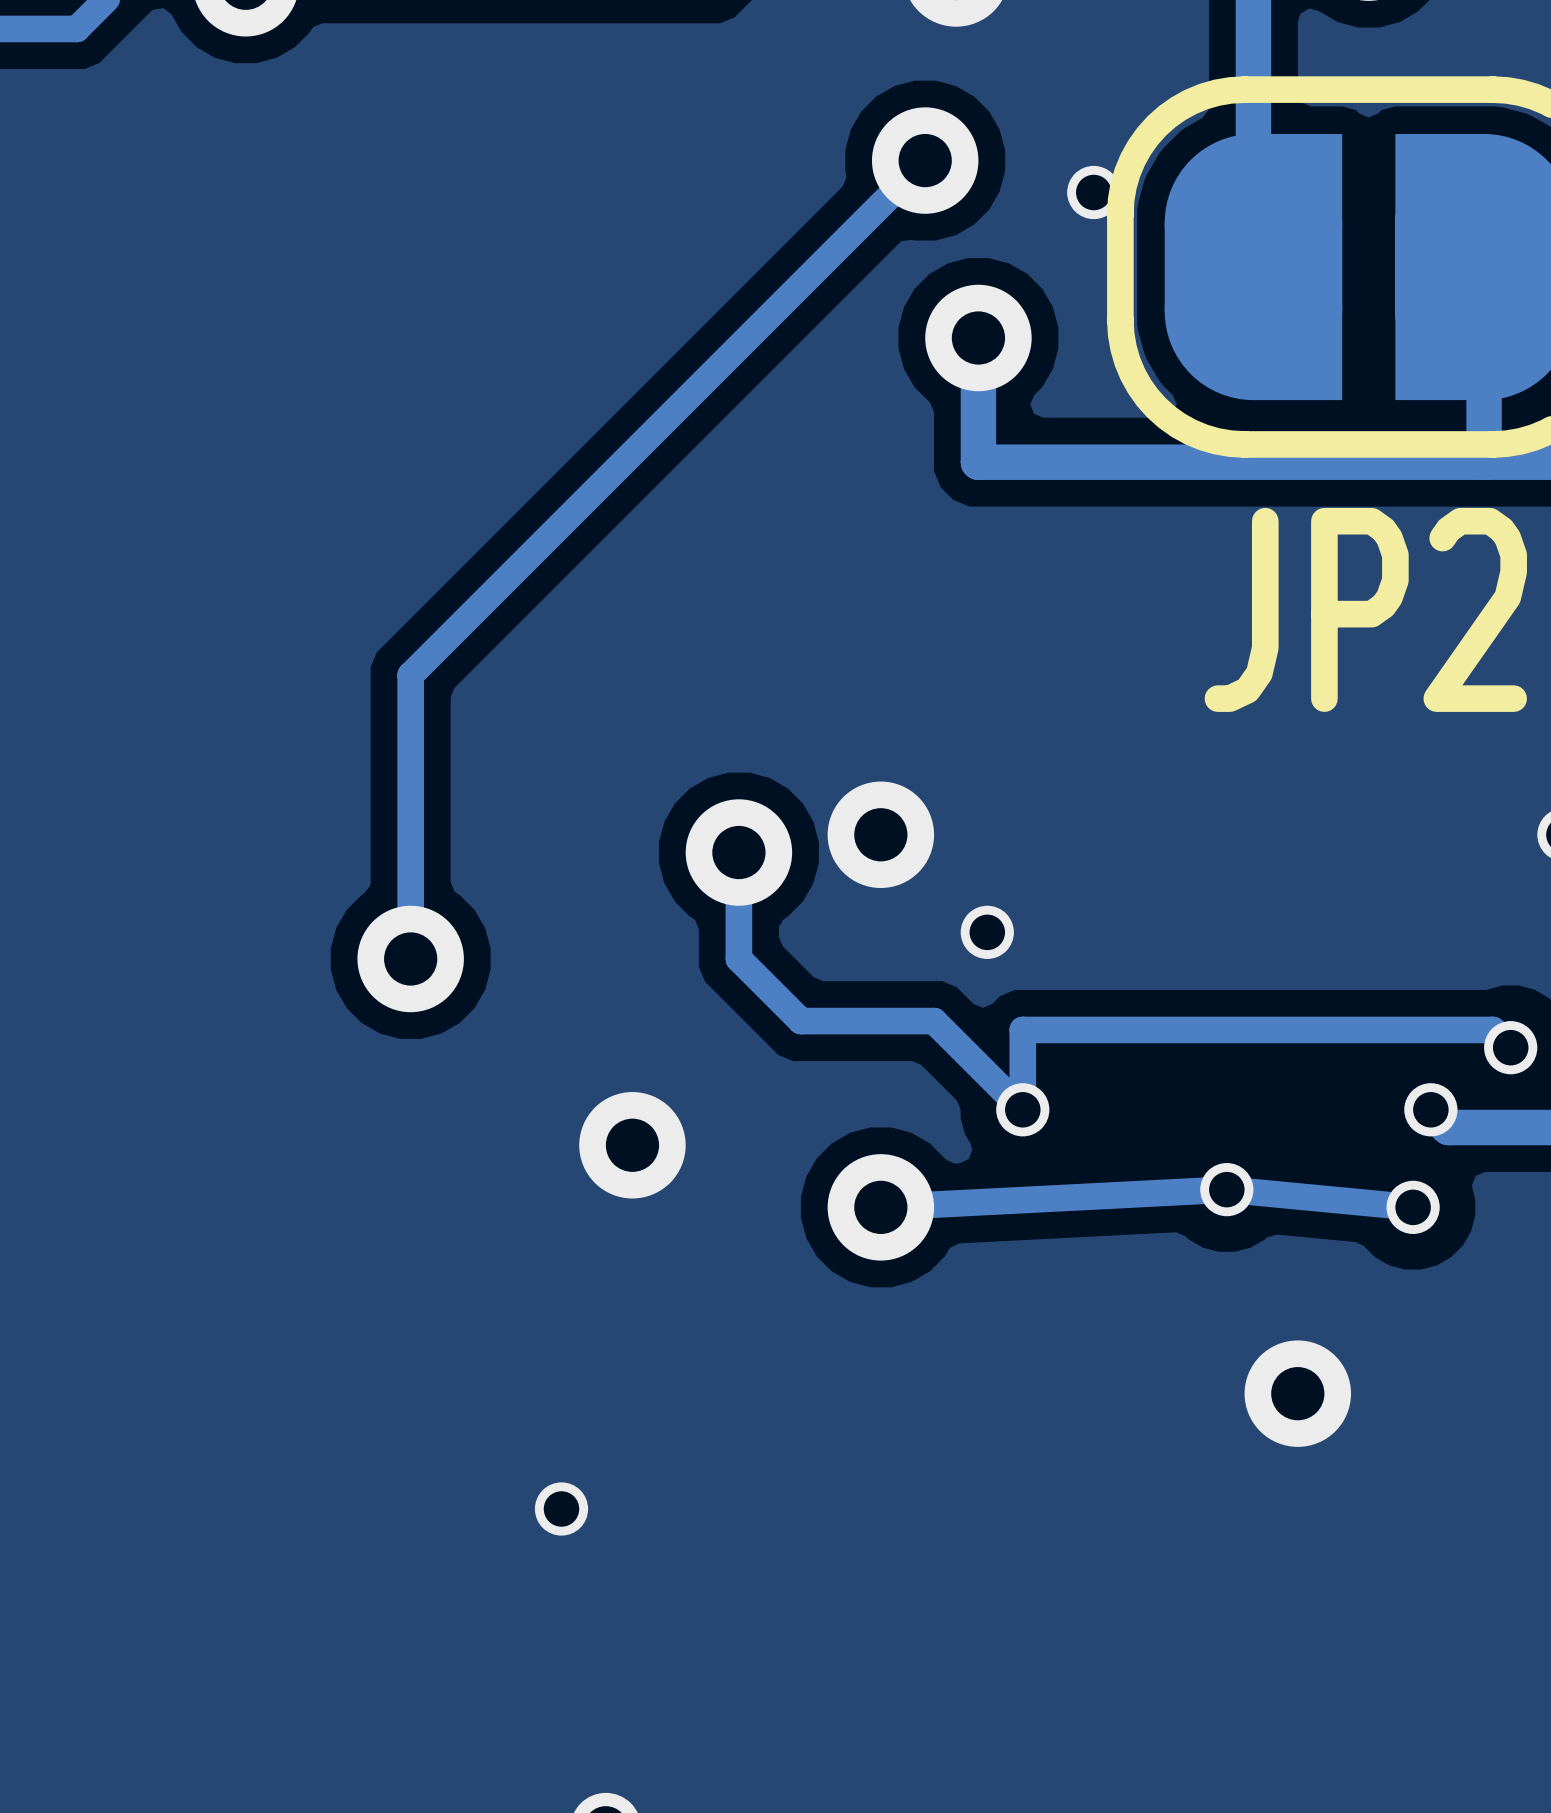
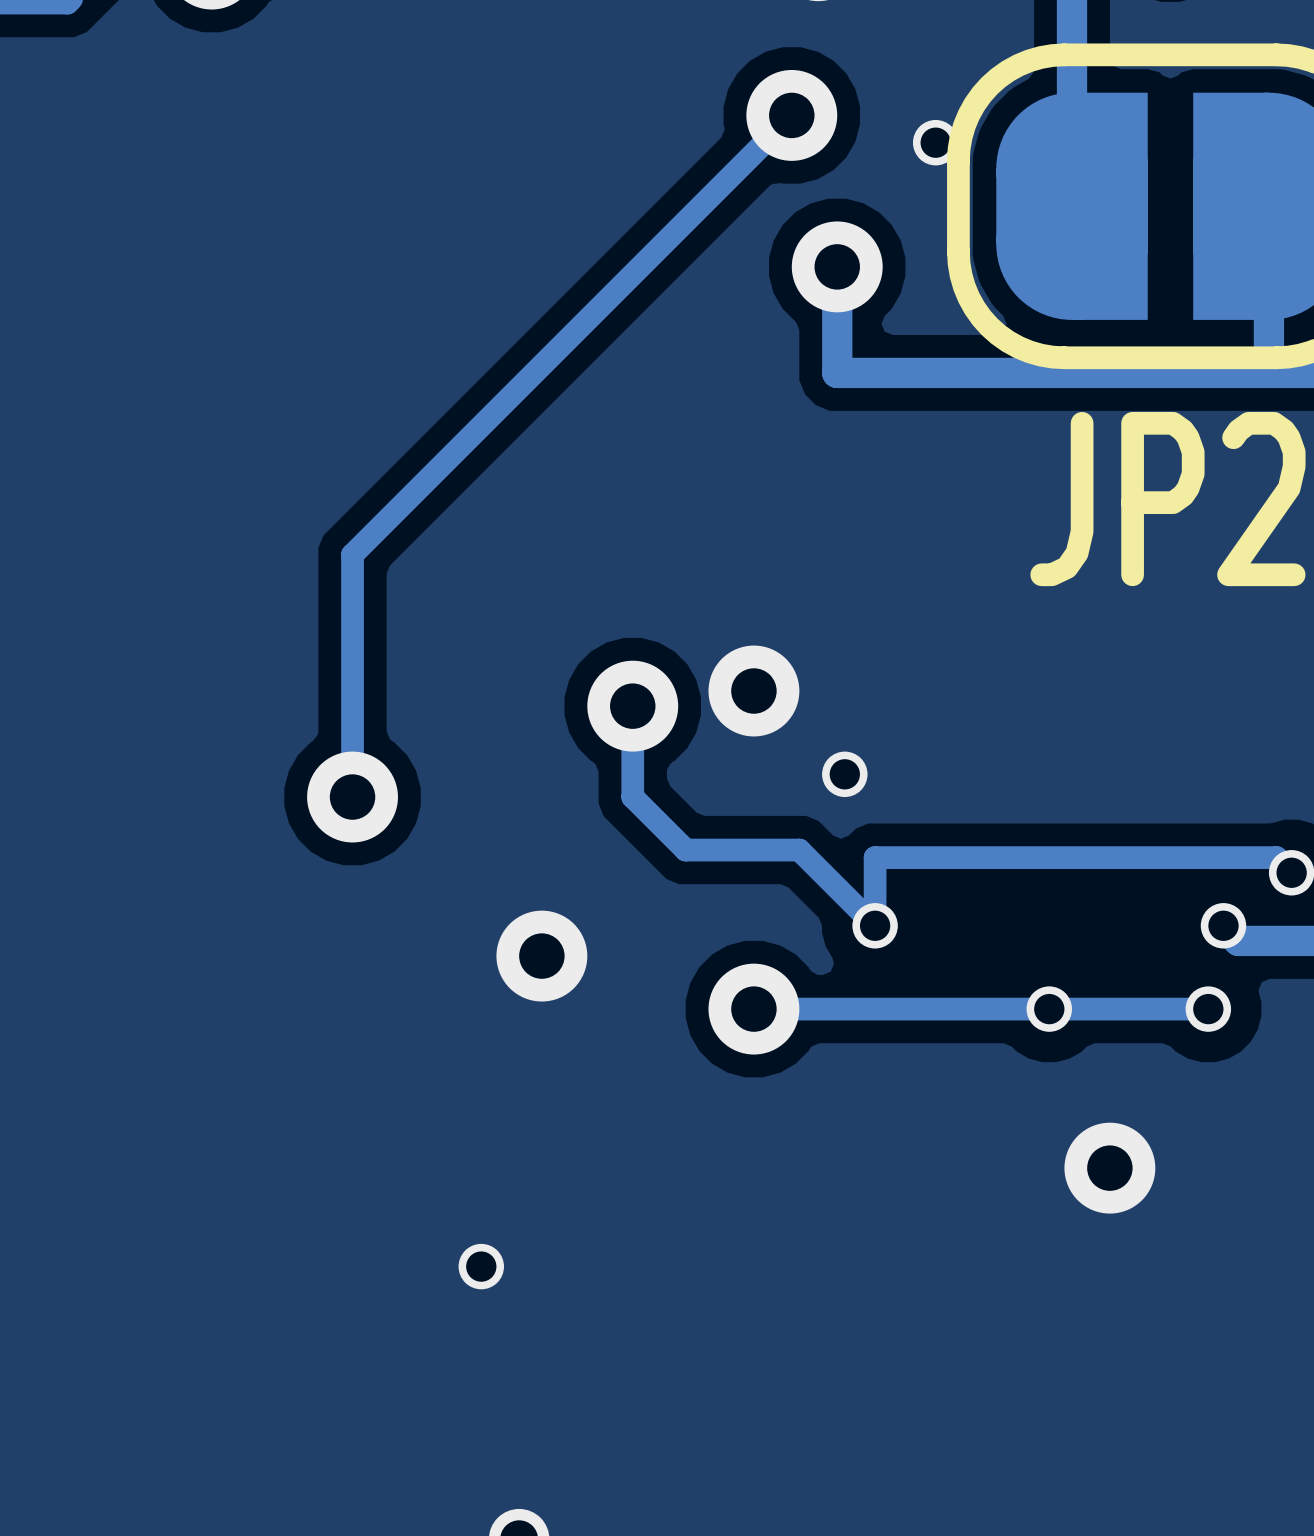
via position: (1226, 1189) -> (1049, 1009)
track: (1413, 1207) (1226, 1189) (880, 1207) -> (1208, 1009) (753, 1009)

